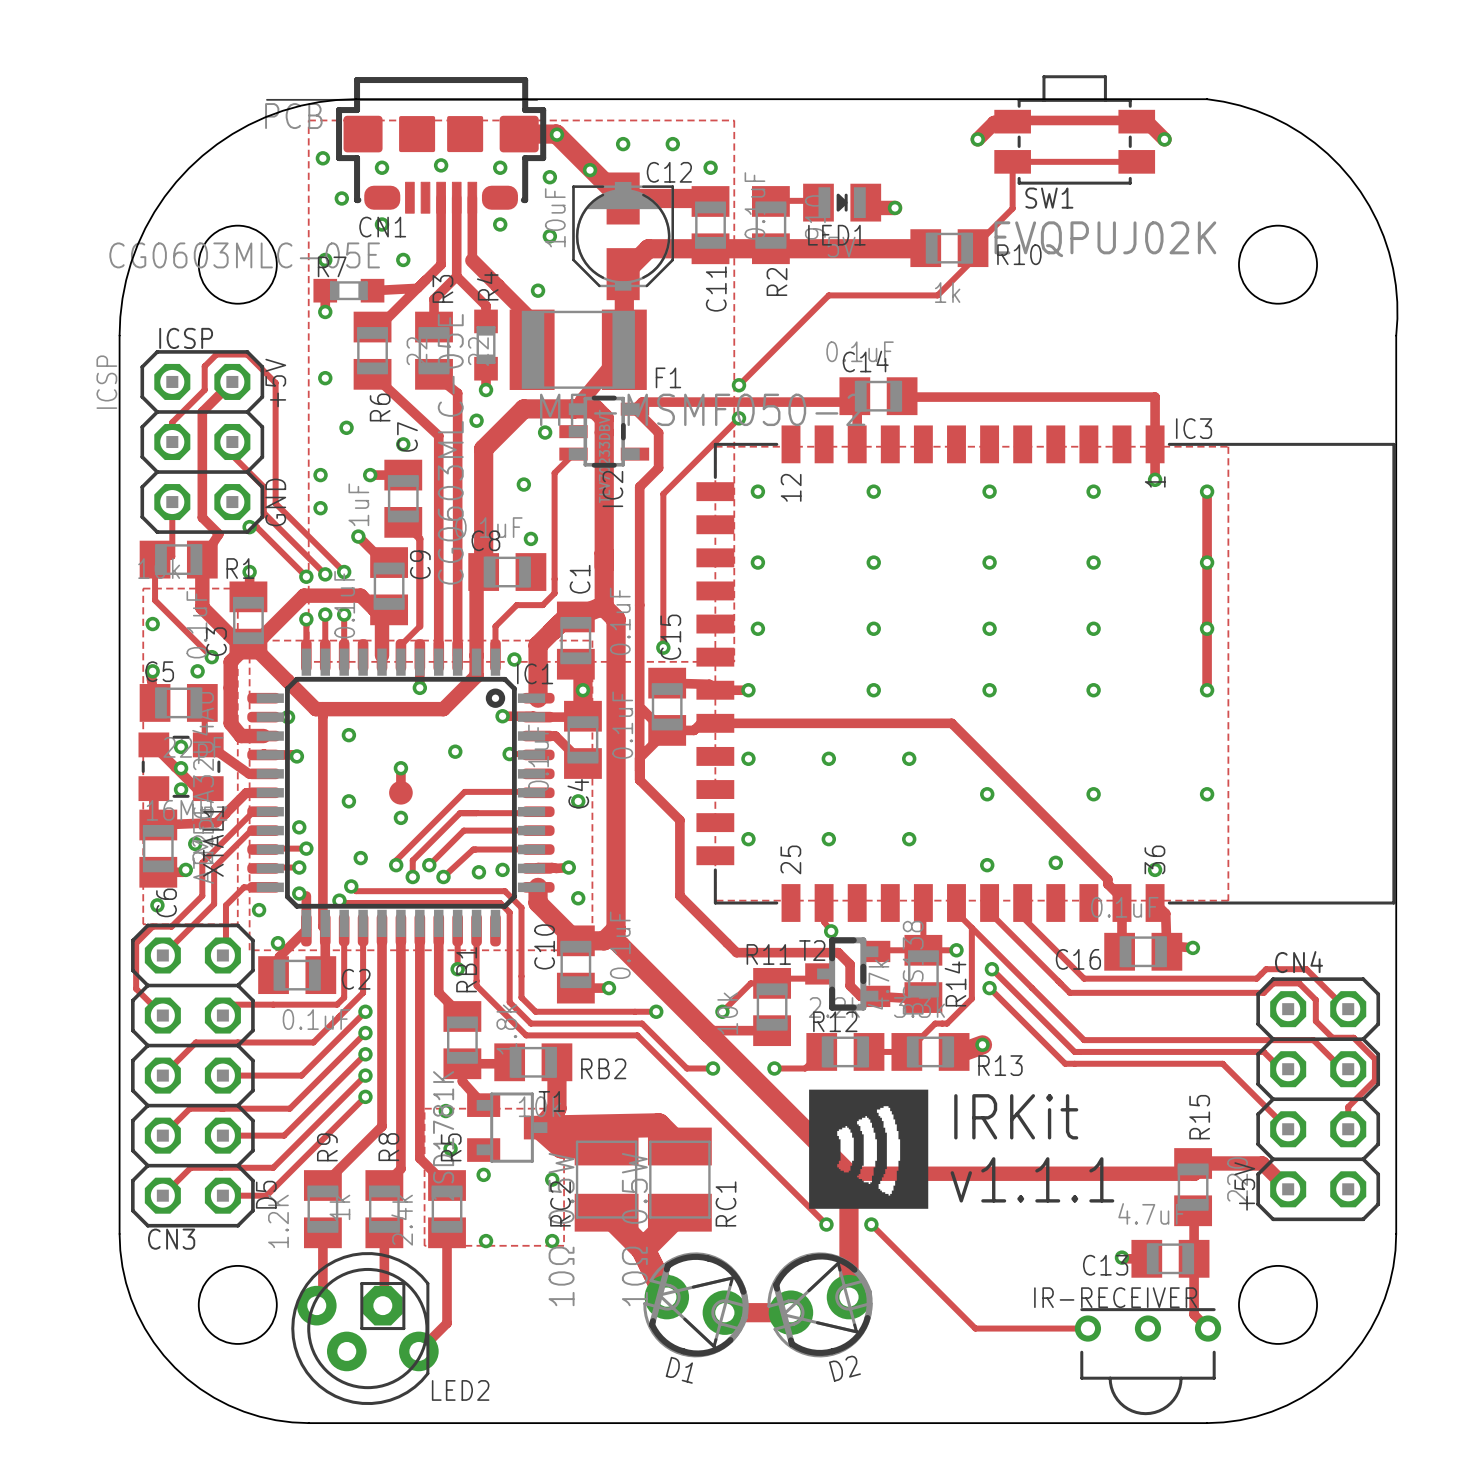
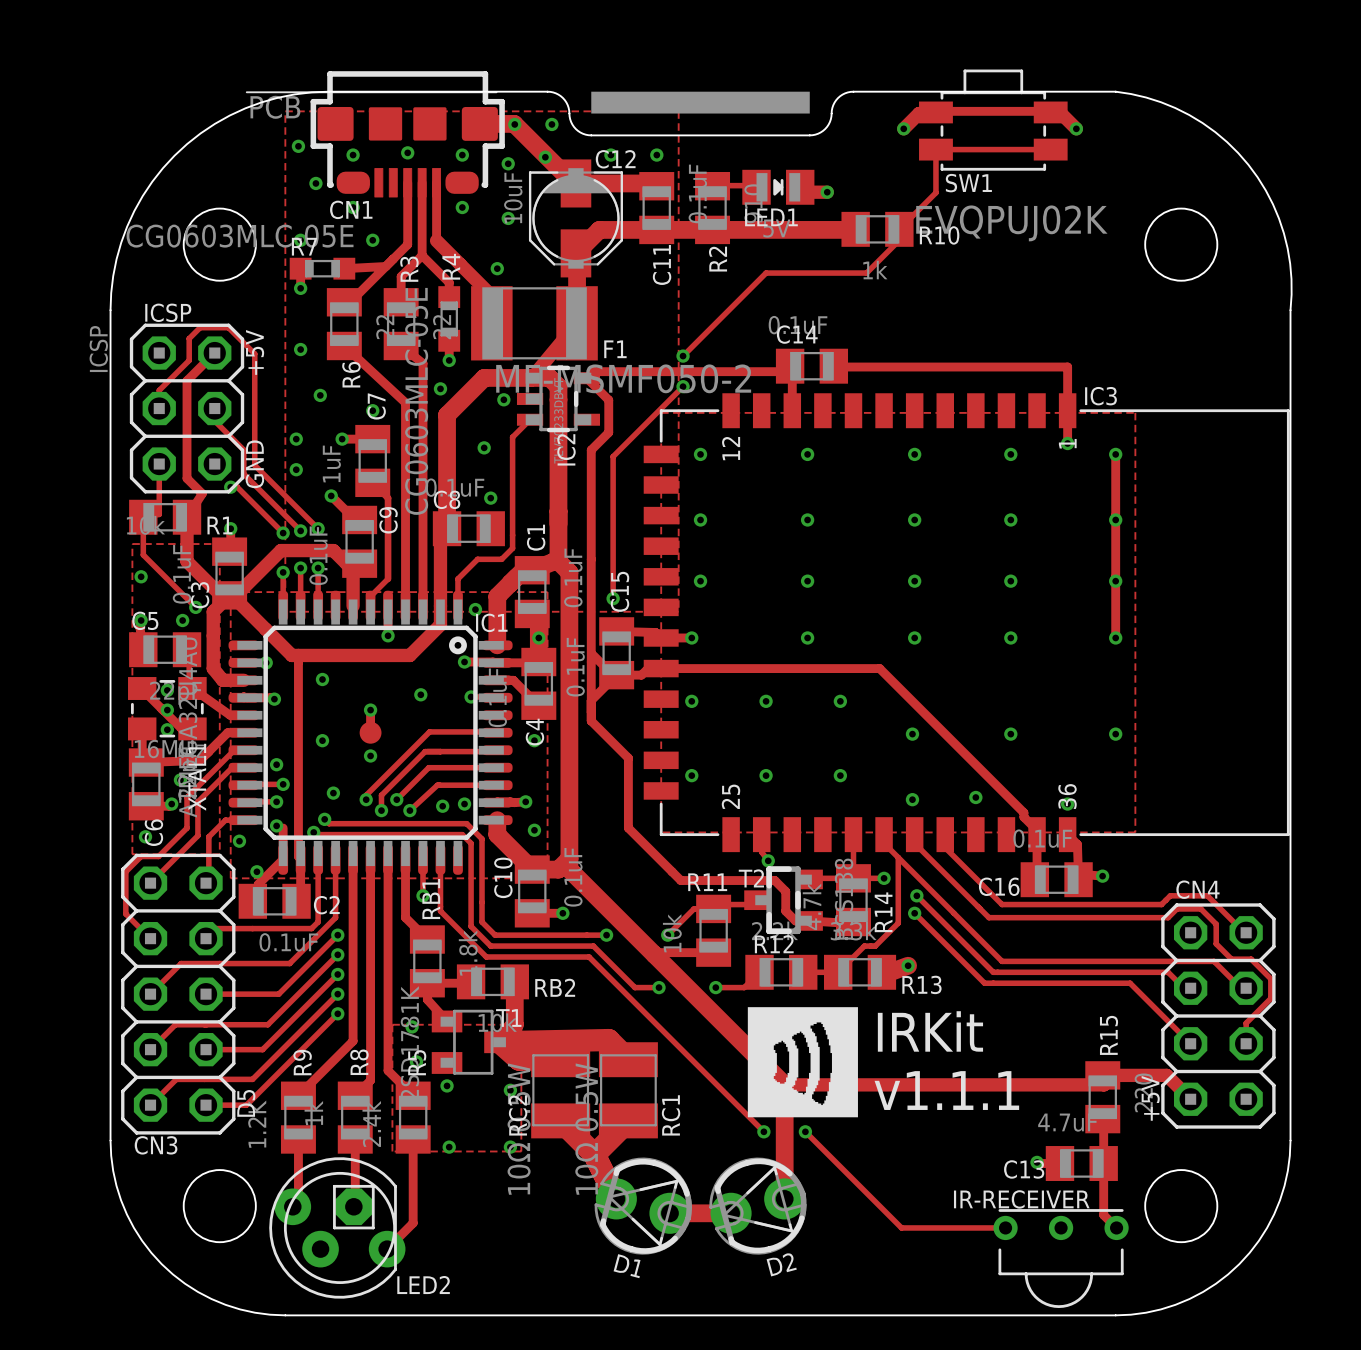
board edge: (592, 99) (923, 99) -> (547, 91) (555, 93) (563, 98) (567, 105) (570, 119) (573, 126) (582, 133) (591, 135) (812, 135) (820, 132) (827, 126) (830, 119) (833, 105) (838, 98) (845, 93) (853, 91)
drawing: none -> [591, 91, 810, 114]
via: none -> (551, 124)
via: (623, 144) -> none
via: (672, 144) -> none
via: none -> (610, 155)

